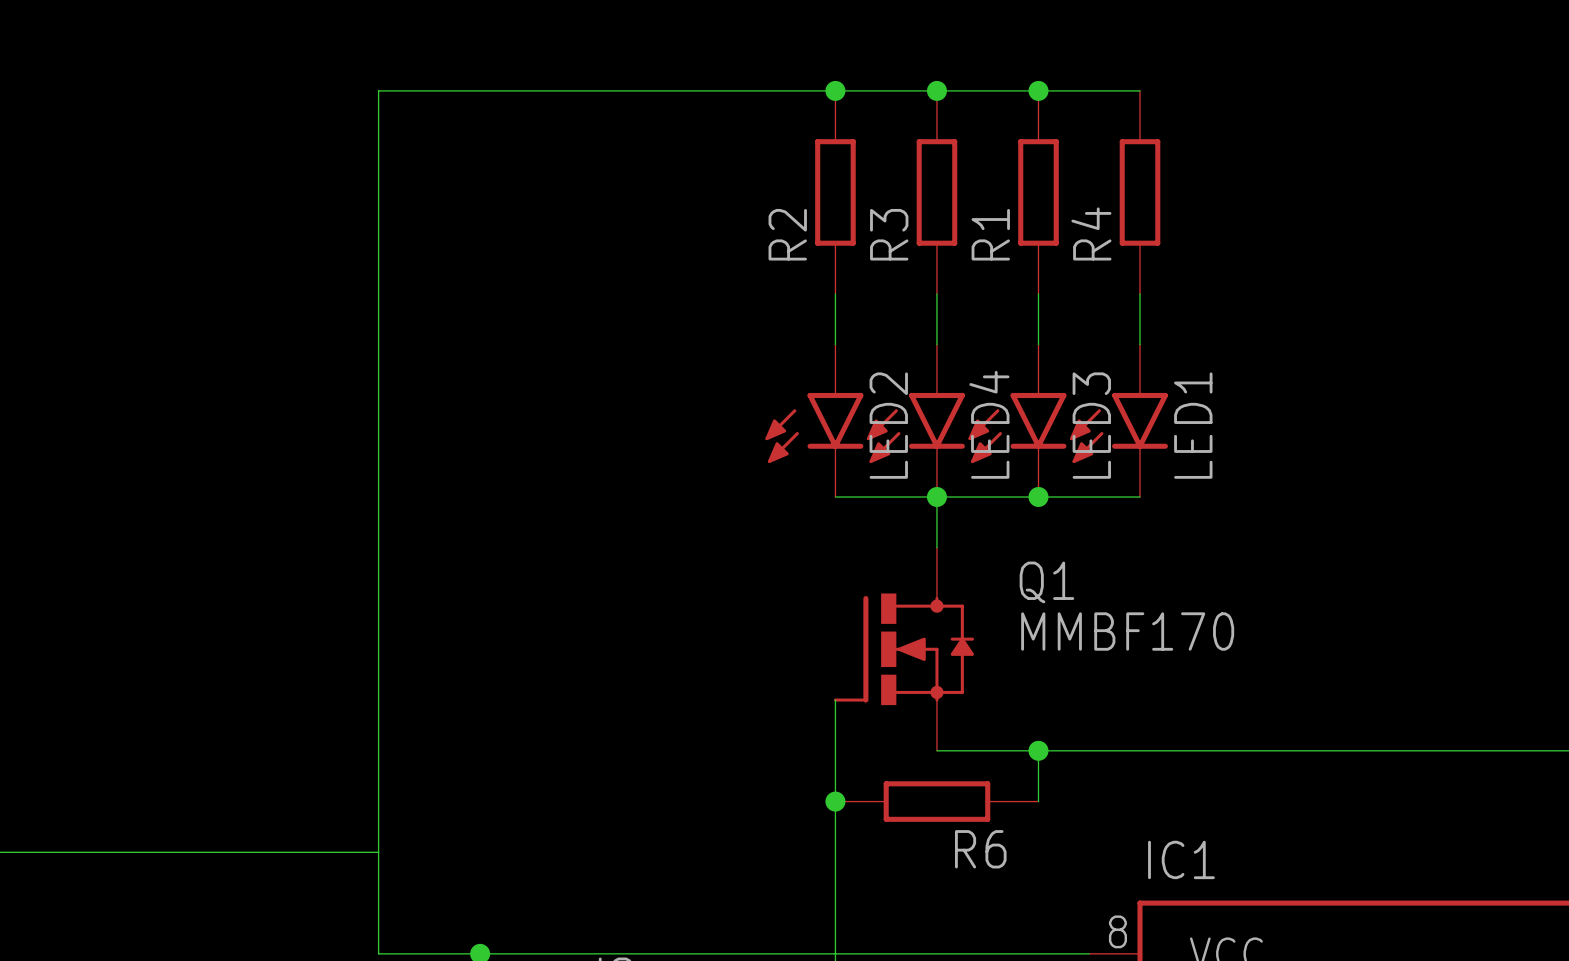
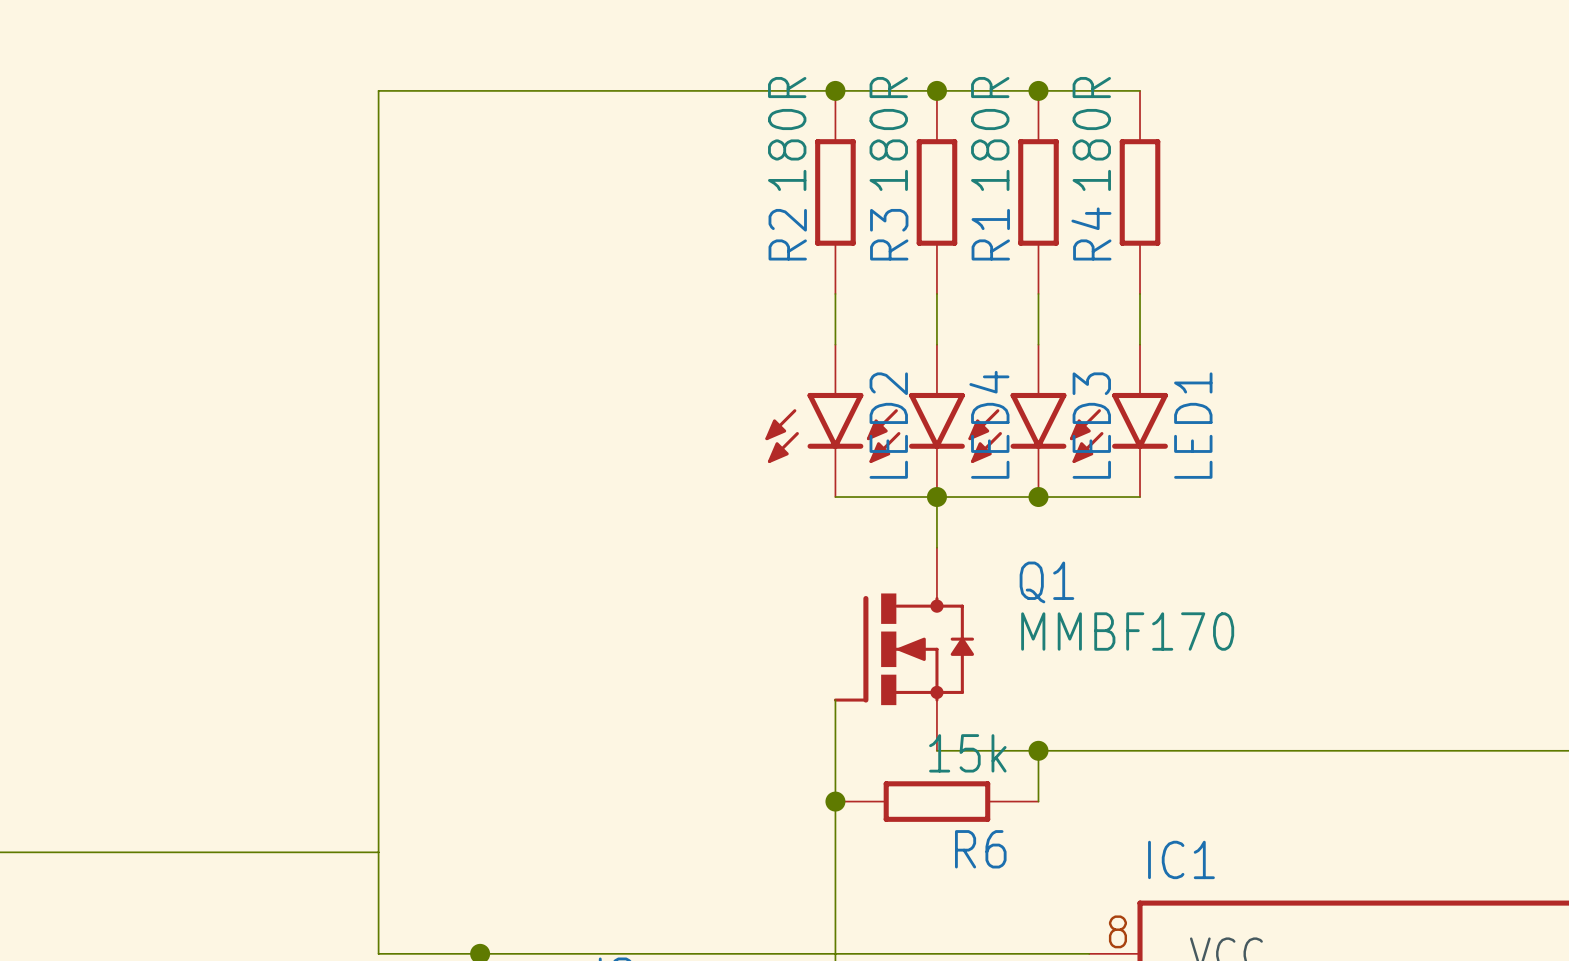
R2 value: none -> 180R (787, 133)
R3 value: none -> 180R (888, 133)
R1 value: none -> 180R (990, 133)
R4 value: none -> 180R (1091, 133)
R6 value: none -> 15k (967, 753)

